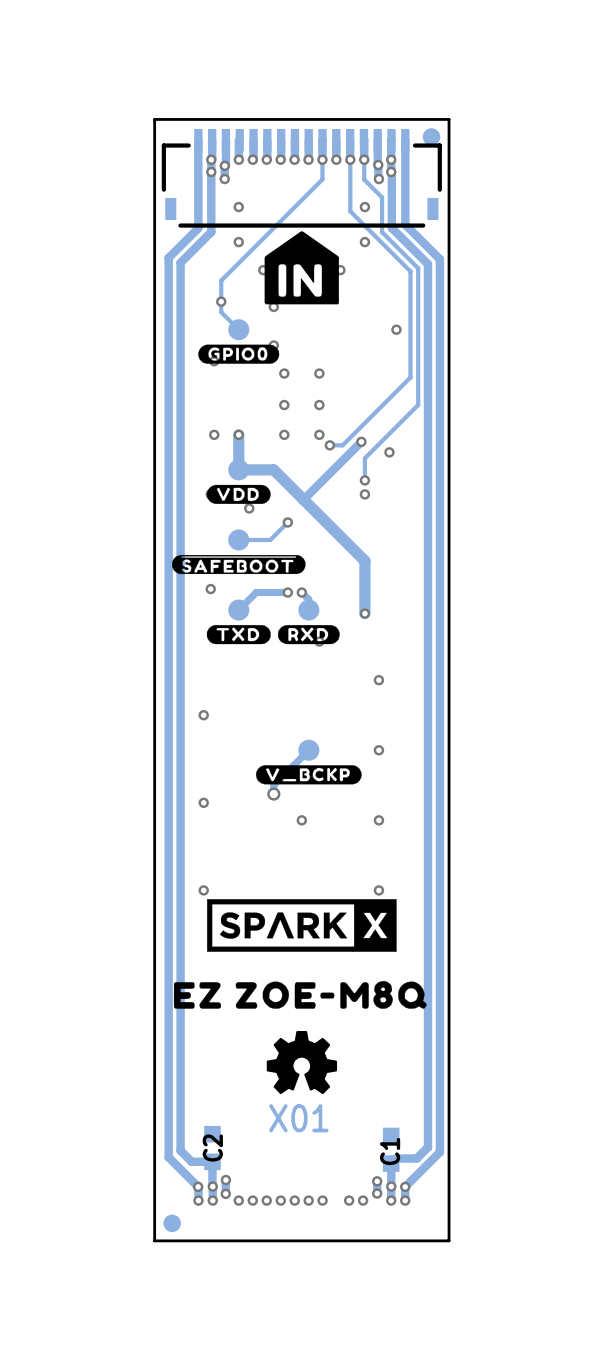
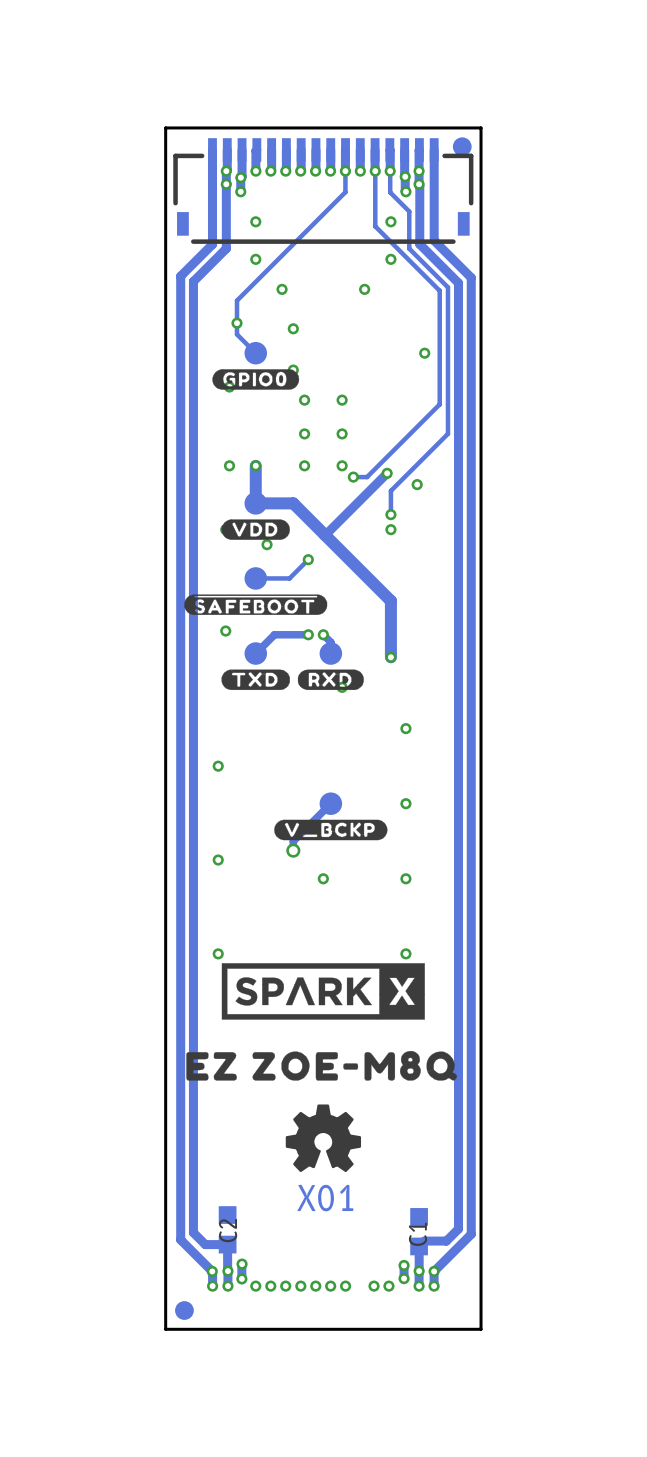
drawing: [264, 231, 339, 305] -> none

